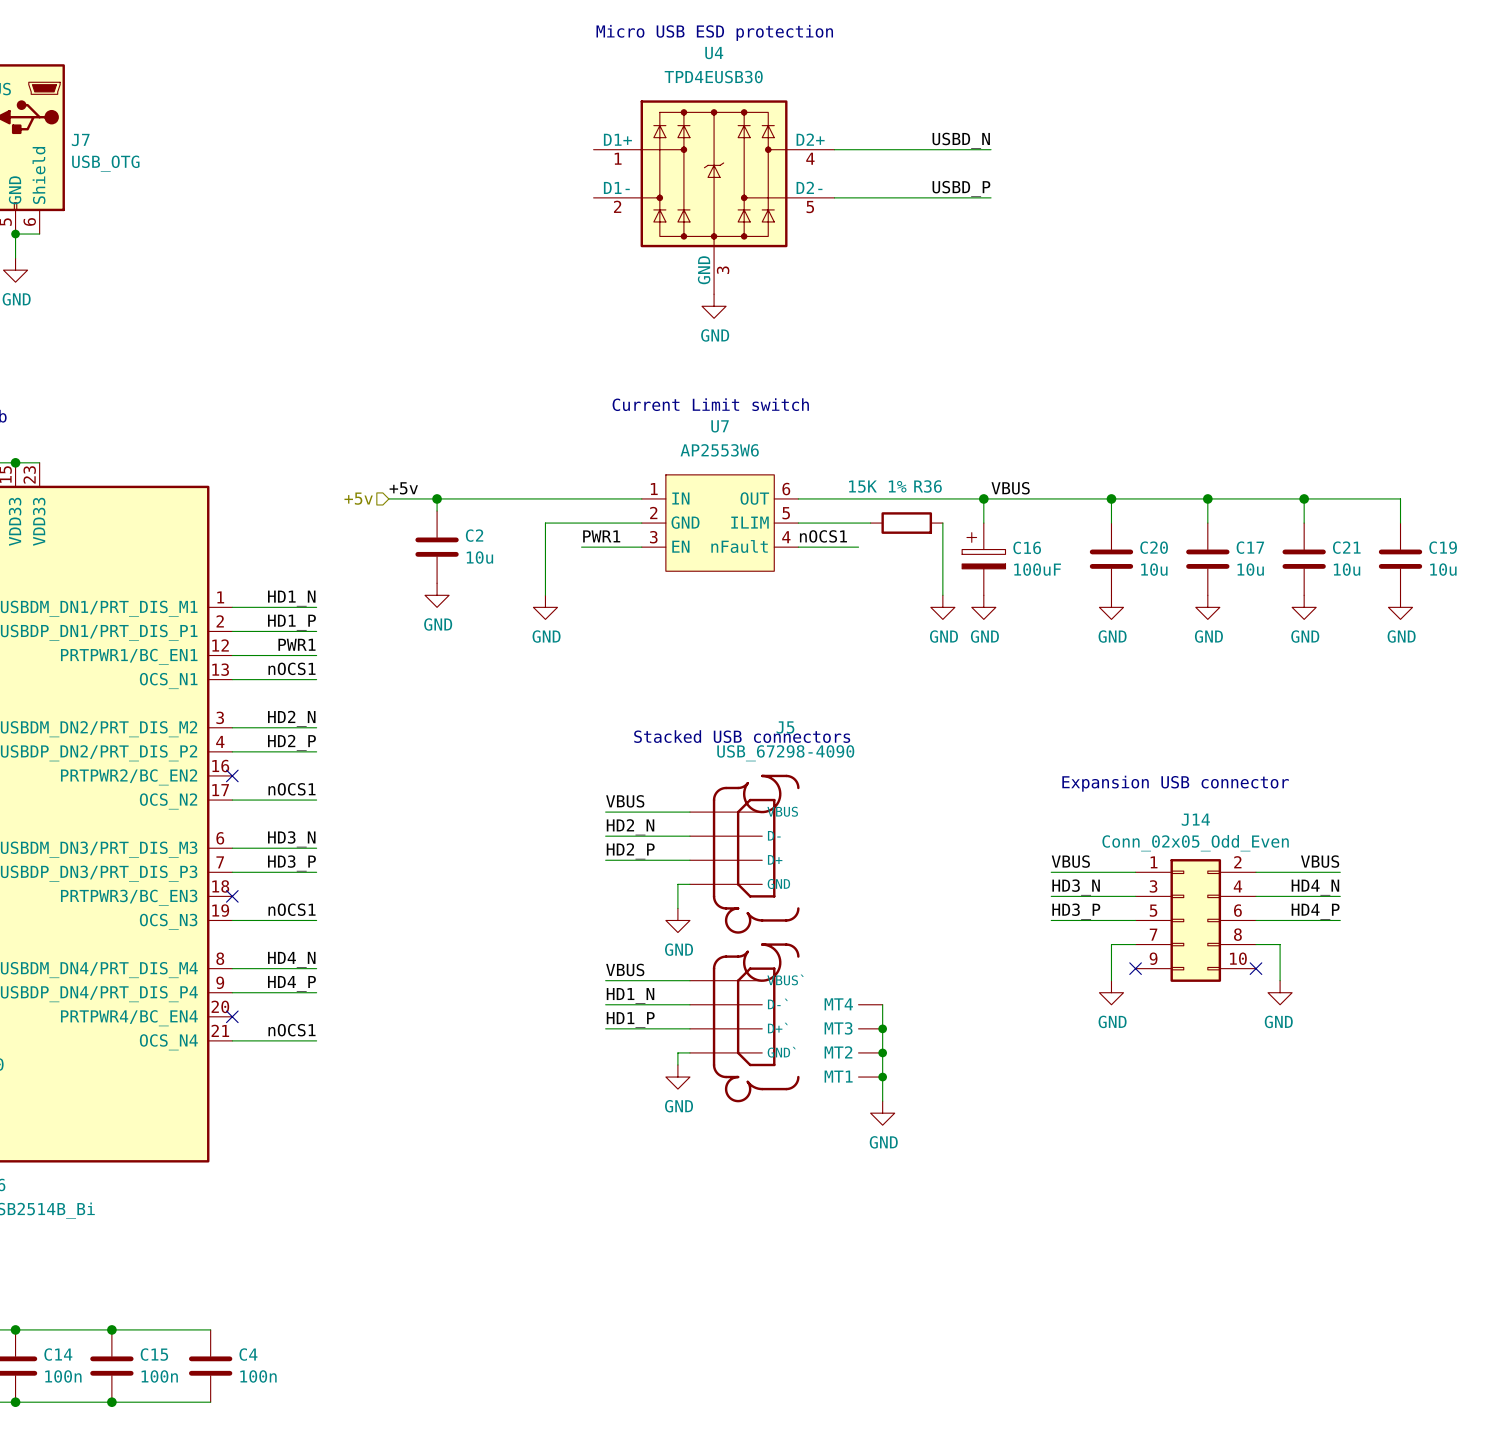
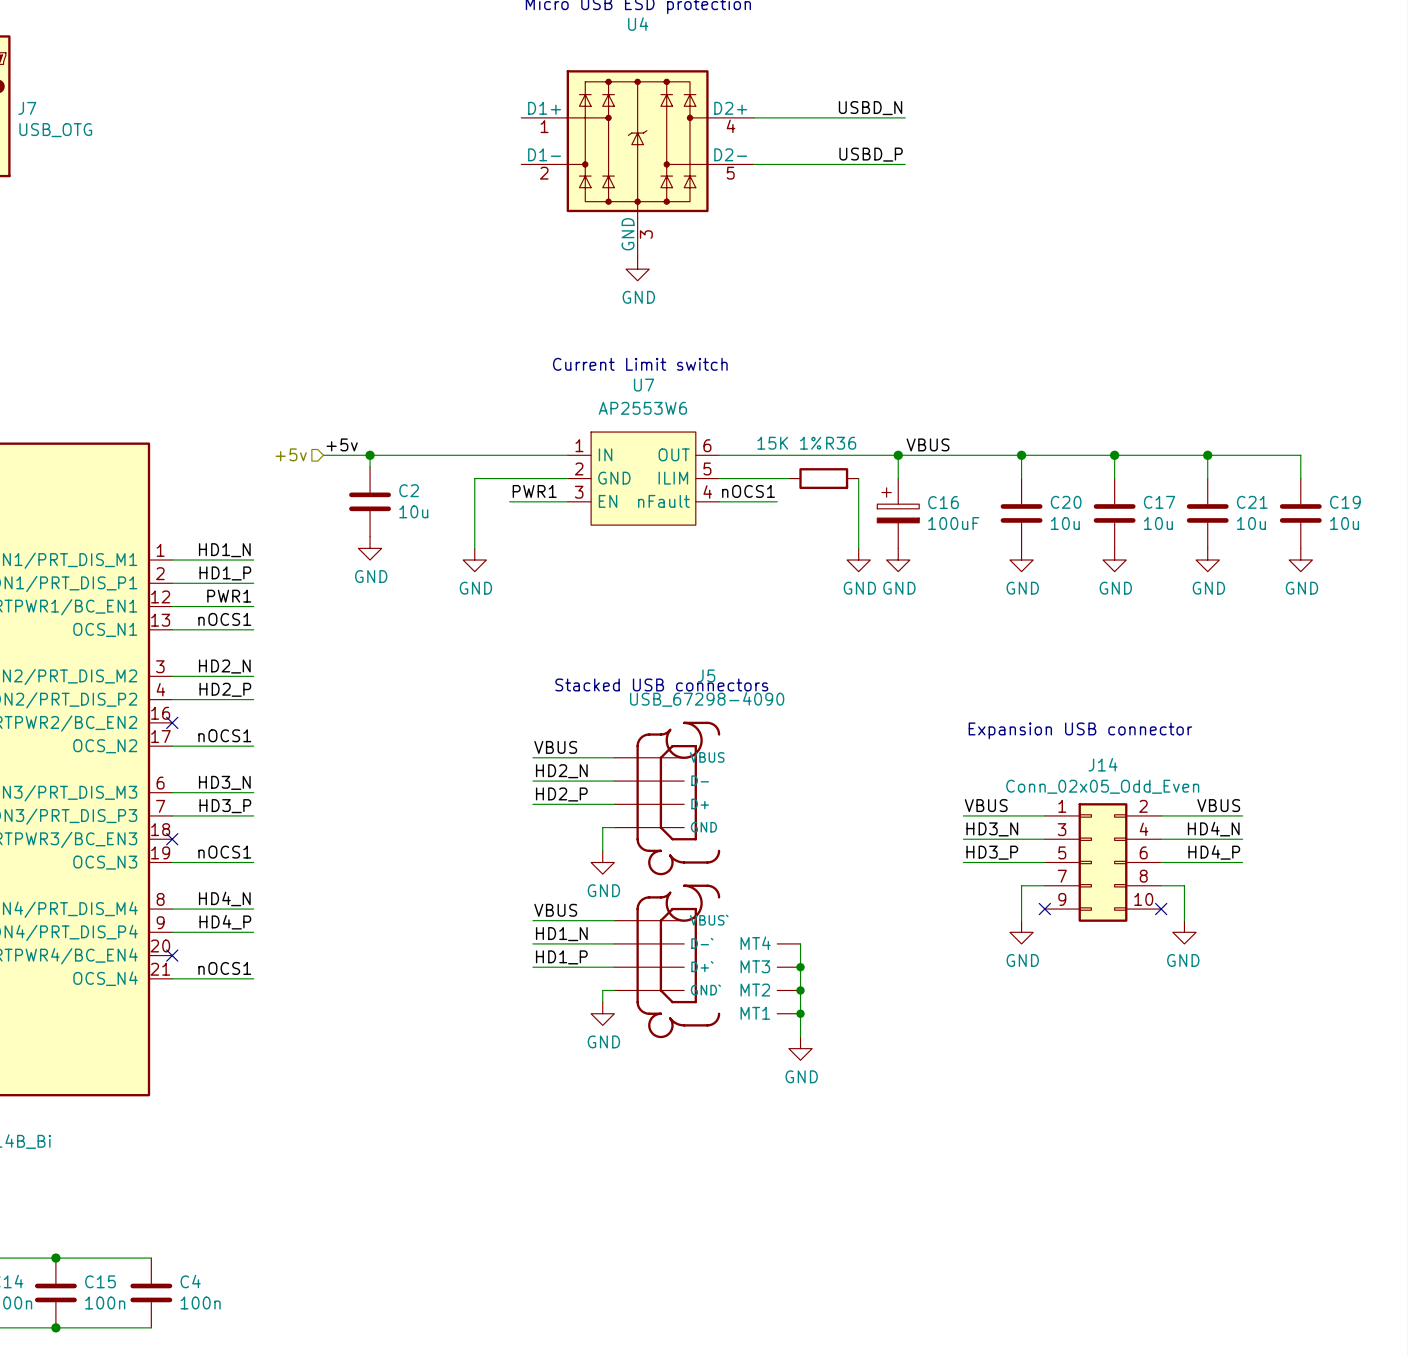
U4 value: TPD4EUSB30 (713, 77) -> none

